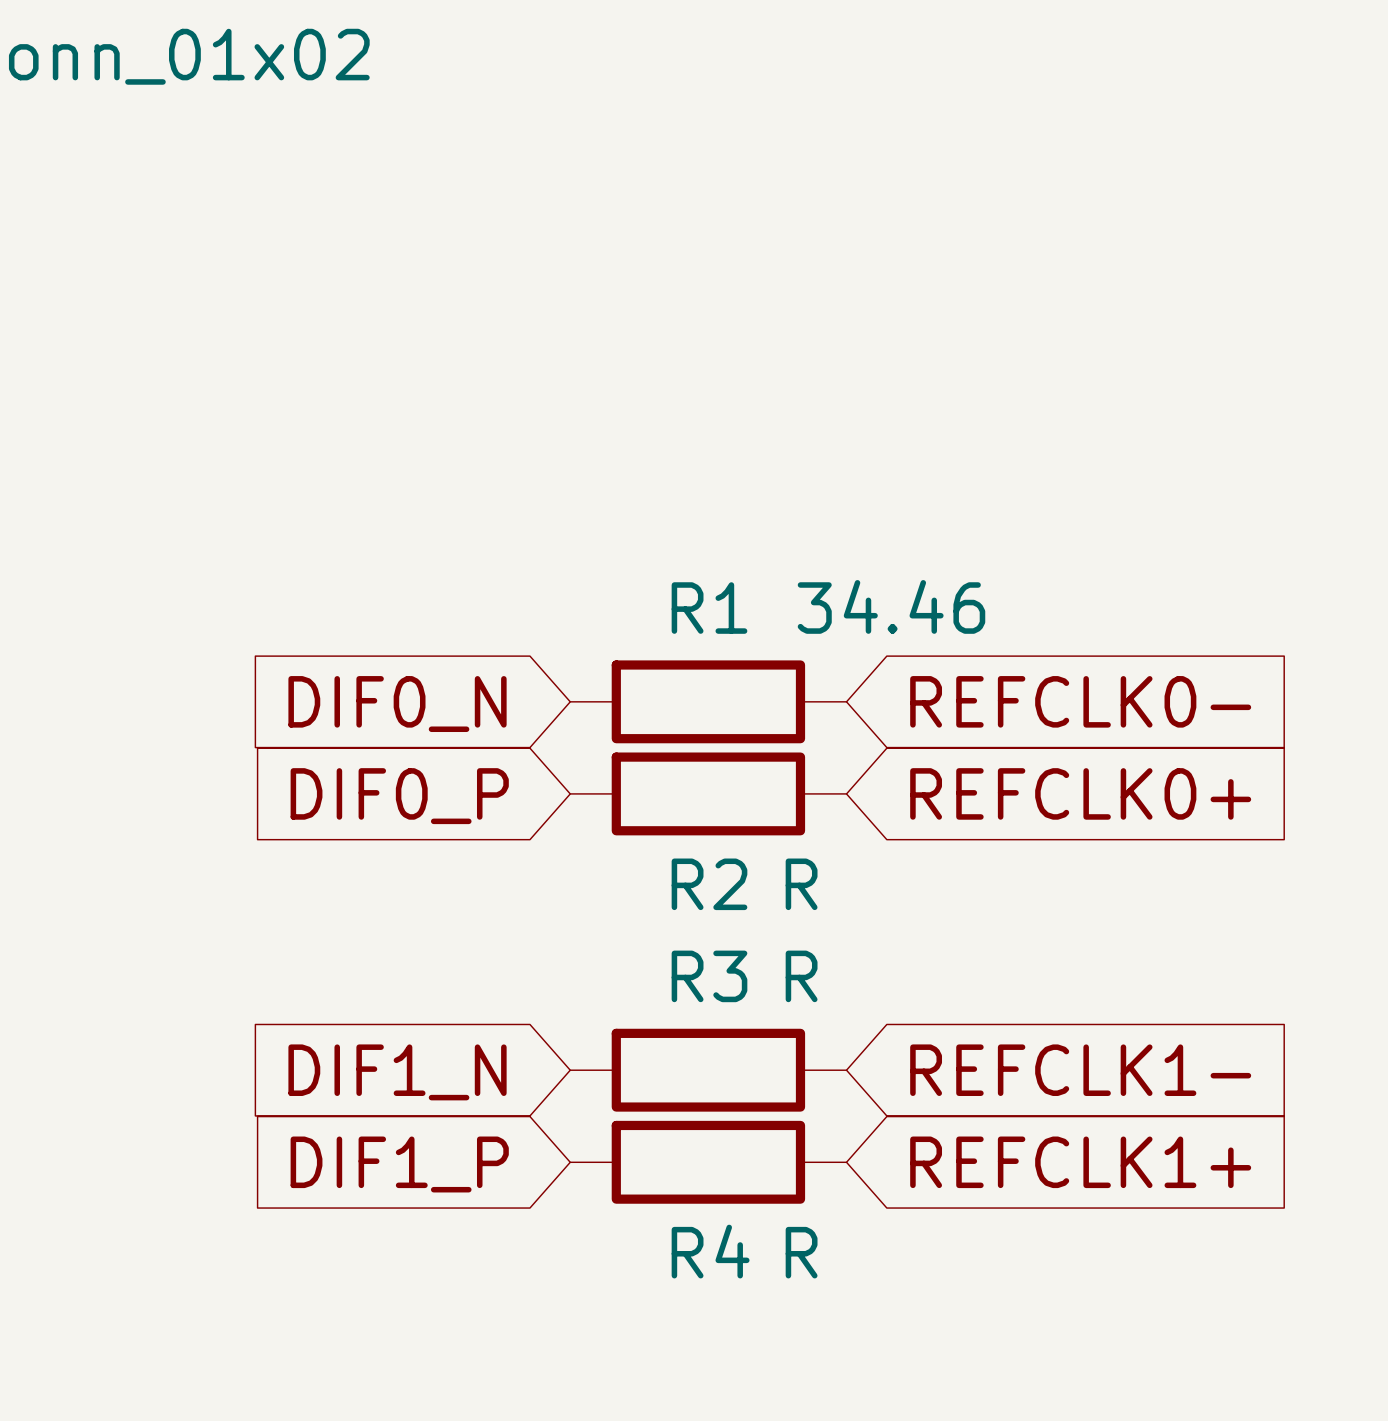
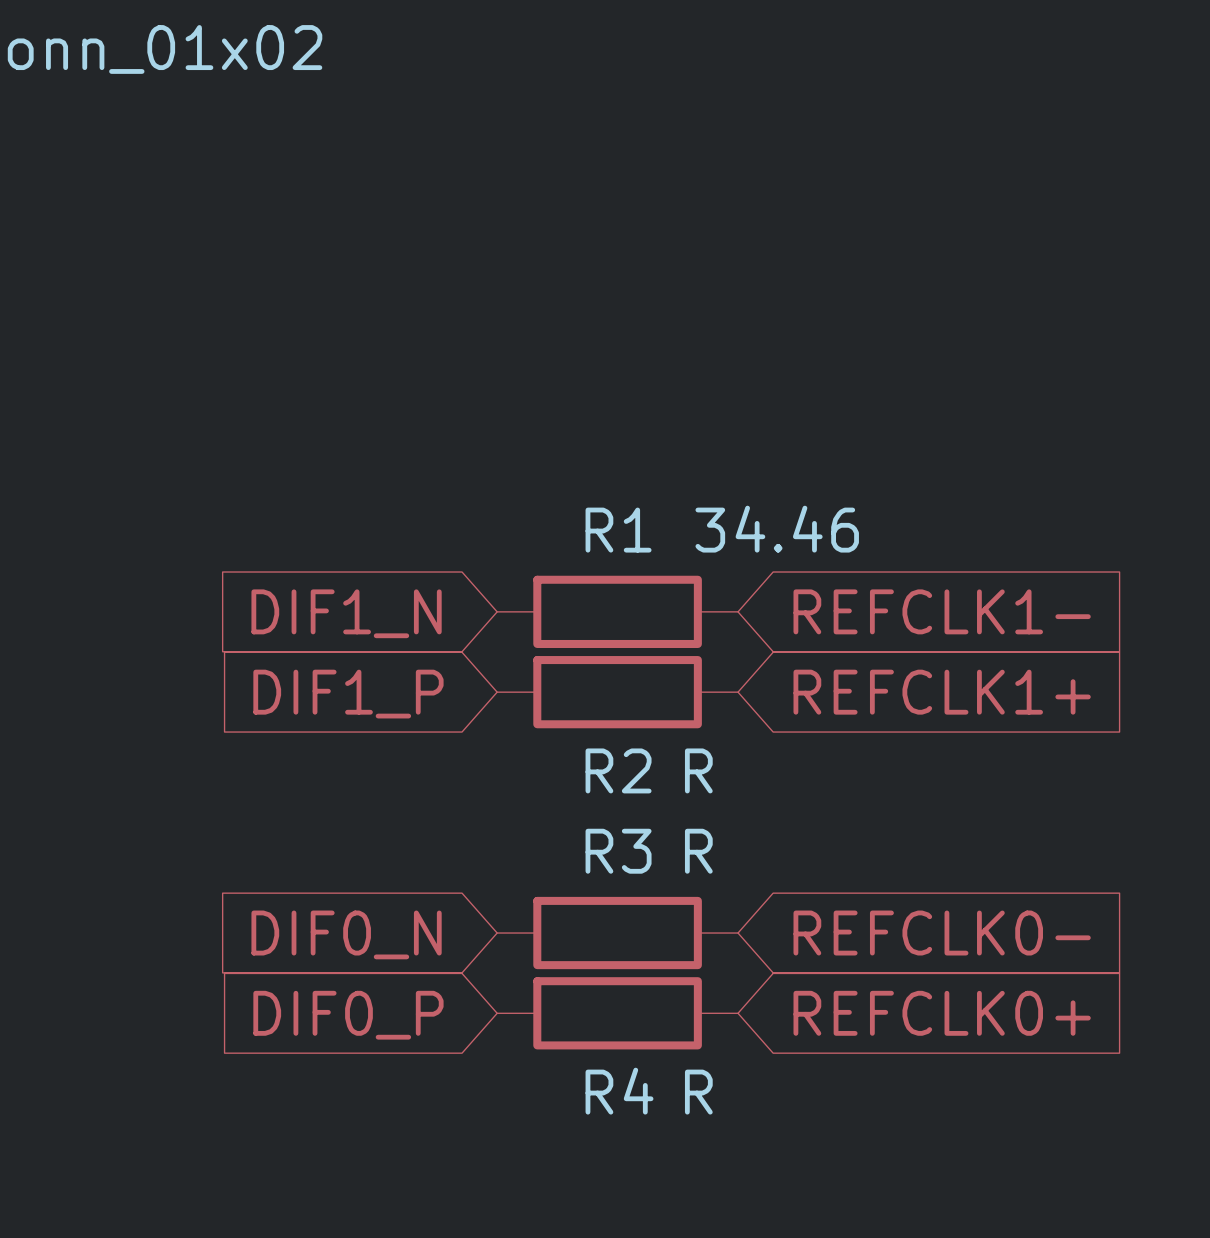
global label: REFCLK0- (1080, 701) -> REFCLK1- (942, 611)
global label: DIF0_N (397, 704) -> DIF1_N (346, 613)
global label: REFCLK0+ (1080, 793) -> REFCLK1+ (942, 692)
global label: DIF0_P (399, 796) -> DIF1_P (348, 694)
global label: REFCLK1- (1080, 1070) -> REFCLK0- (942, 933)
global label: DIF1_N (397, 1072) -> DIF0_N (346, 934)
global label: REFCLK1+ (1080, 1162) -> REFCLK0+ (942, 1013)
global label: DIF1_P (399, 1164) -> DIF0_P (348, 1015)

